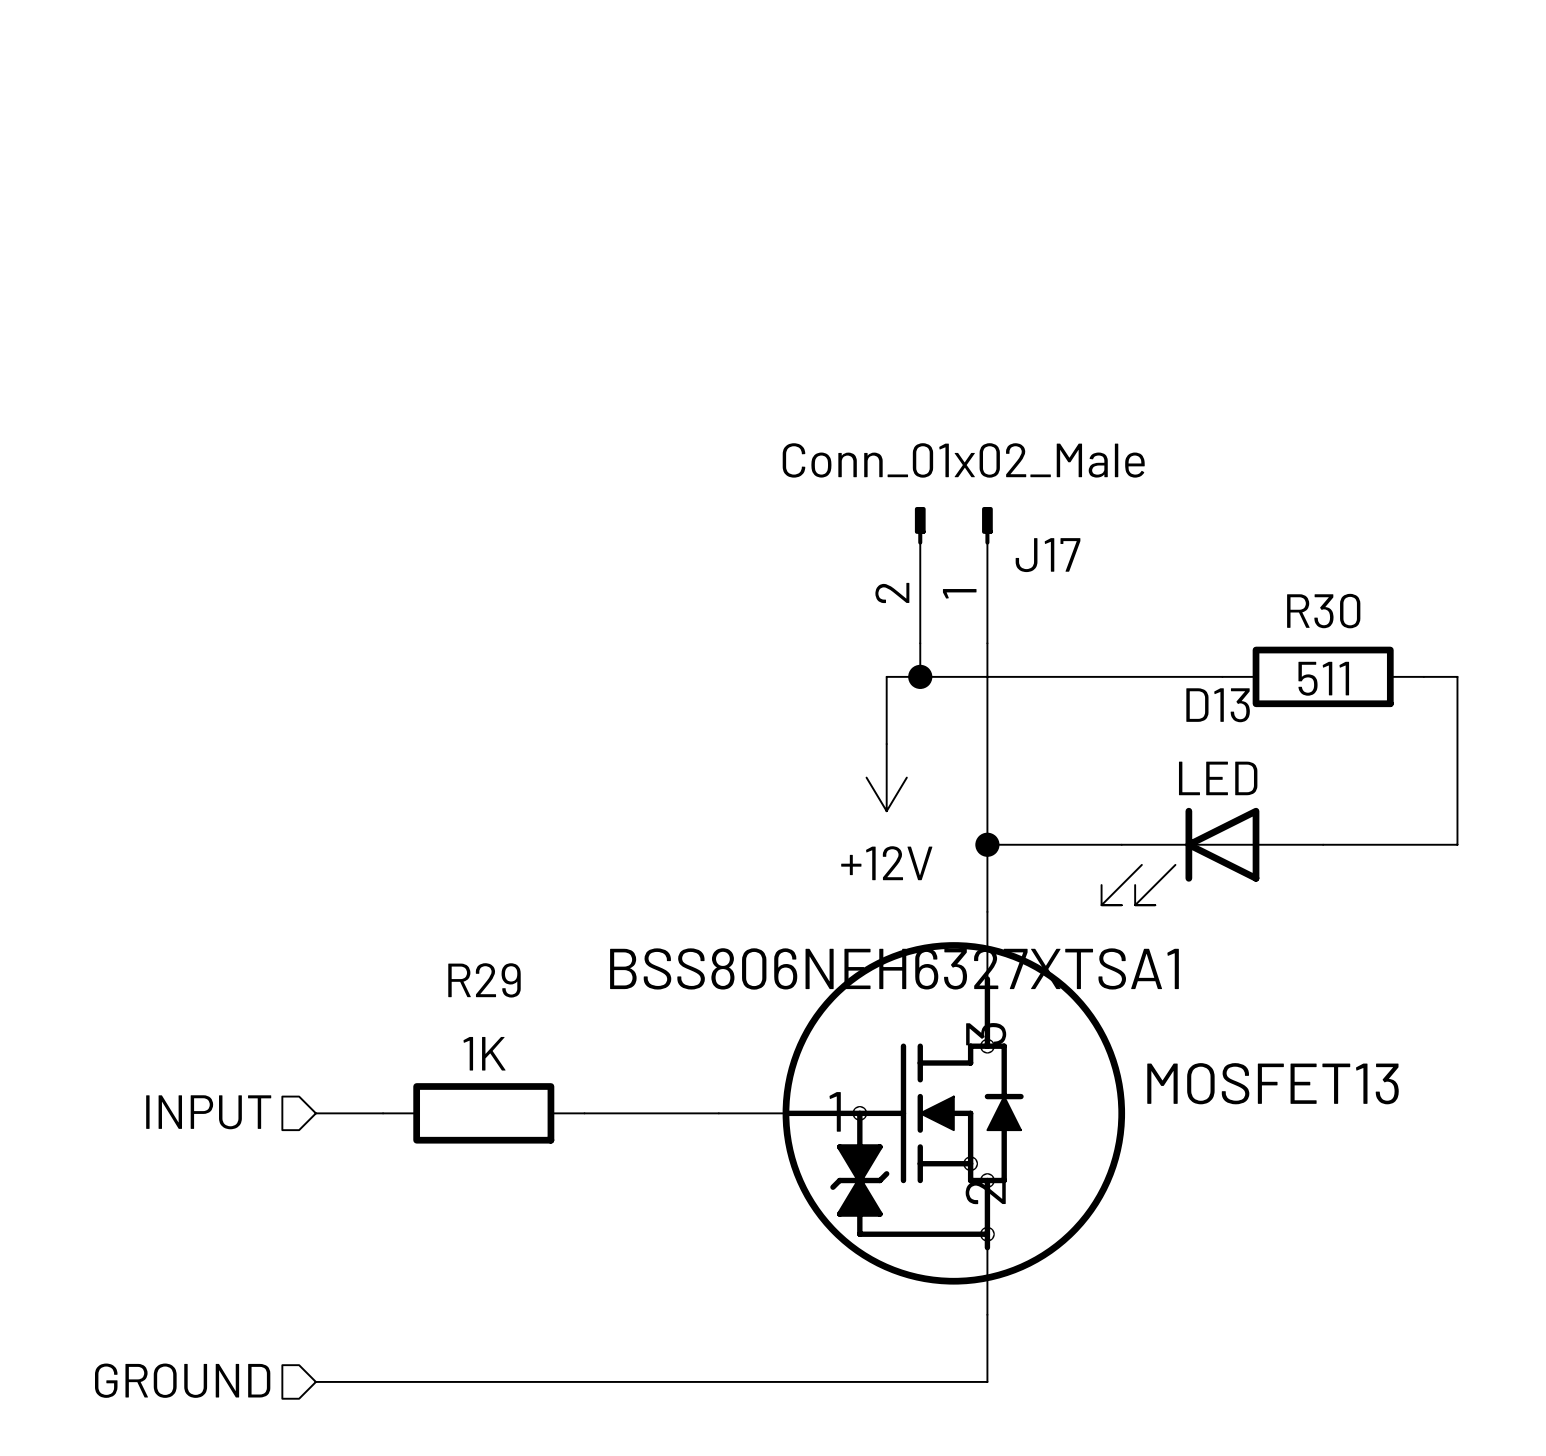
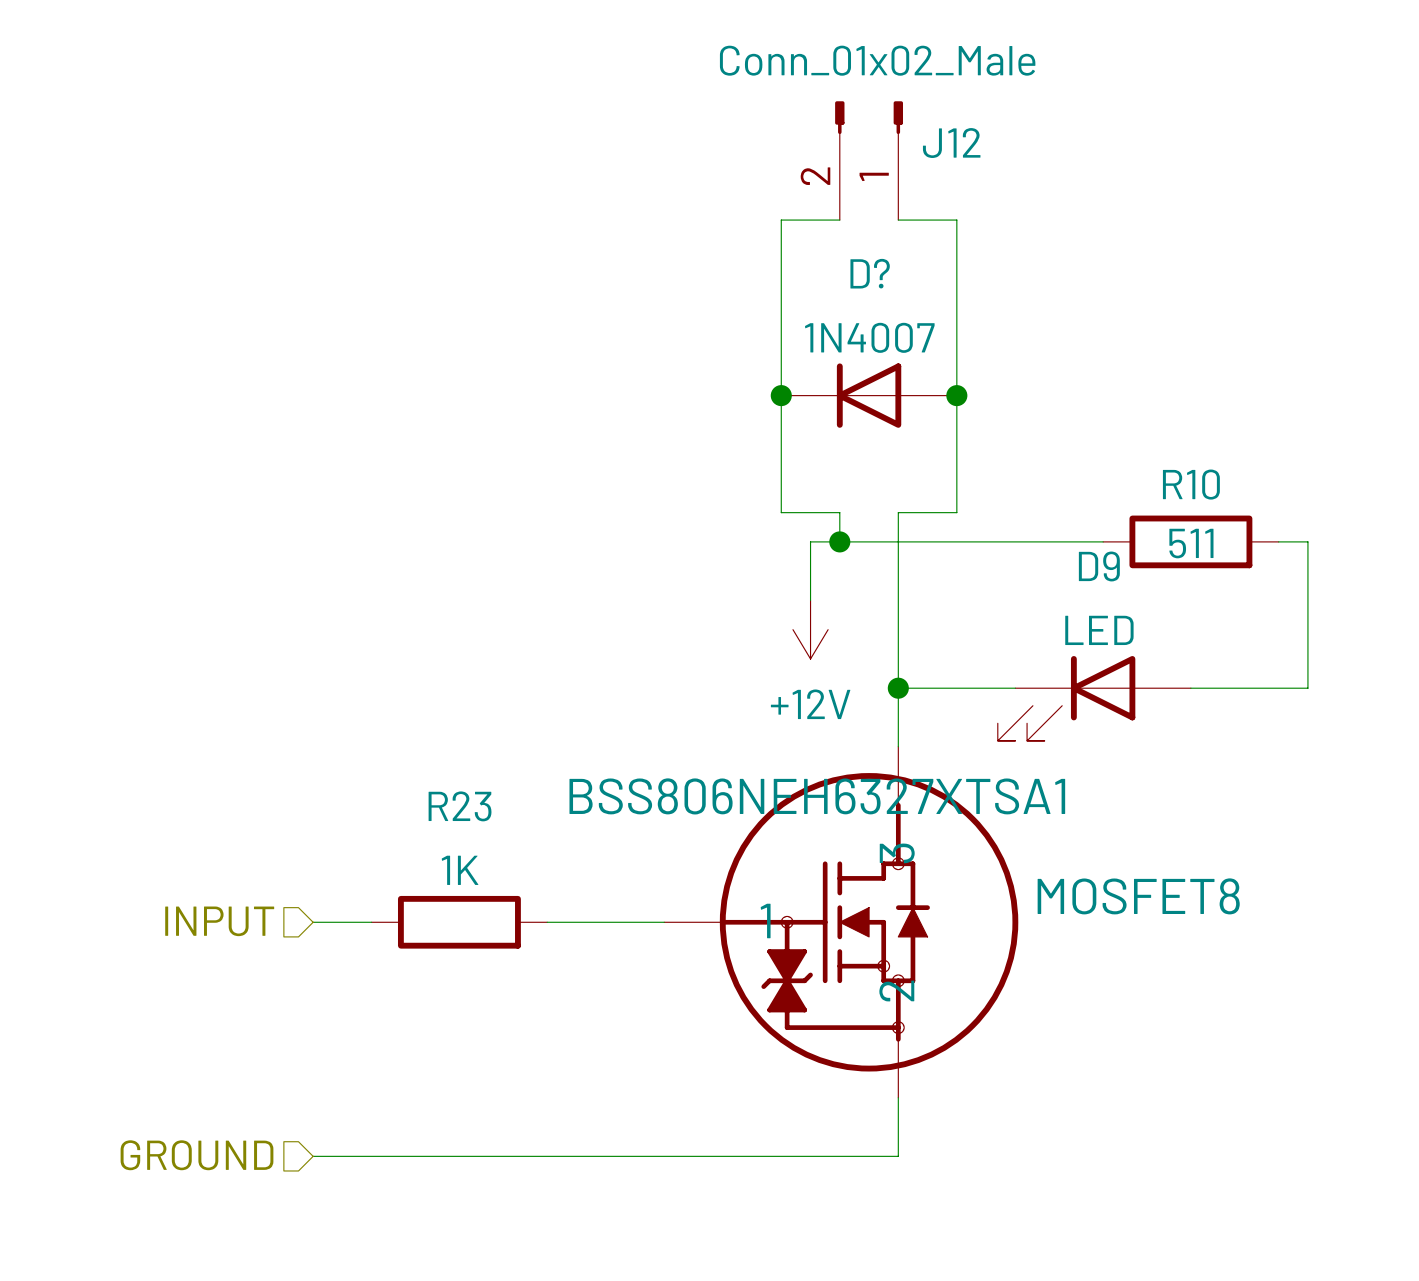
J12: none -> Conn_01x02_Male (869, 160)
wire: none -> (839, 220) (781, 220) (781, 512) (839, 512)
wire: none -> (898, 220) (956, 220) (956, 512) (898, 512)
junction: none -> (781, 395)
D?: none -> 1N4007 (869, 395)
junction: none -> (956, 395)
J17: Conn_01x02_Male (953, 575) -> none
R30 name: R30 (1323, 611) -> R10 (1191, 484)
D13 name: D13 (1218, 705) -> D9 (1099, 566)
R29 name: R29 (484, 980) -> R23 (460, 806)
MOSFET13 name: MOSFET13 (1273, 1083) -> MOSFET8 (1138, 896)

